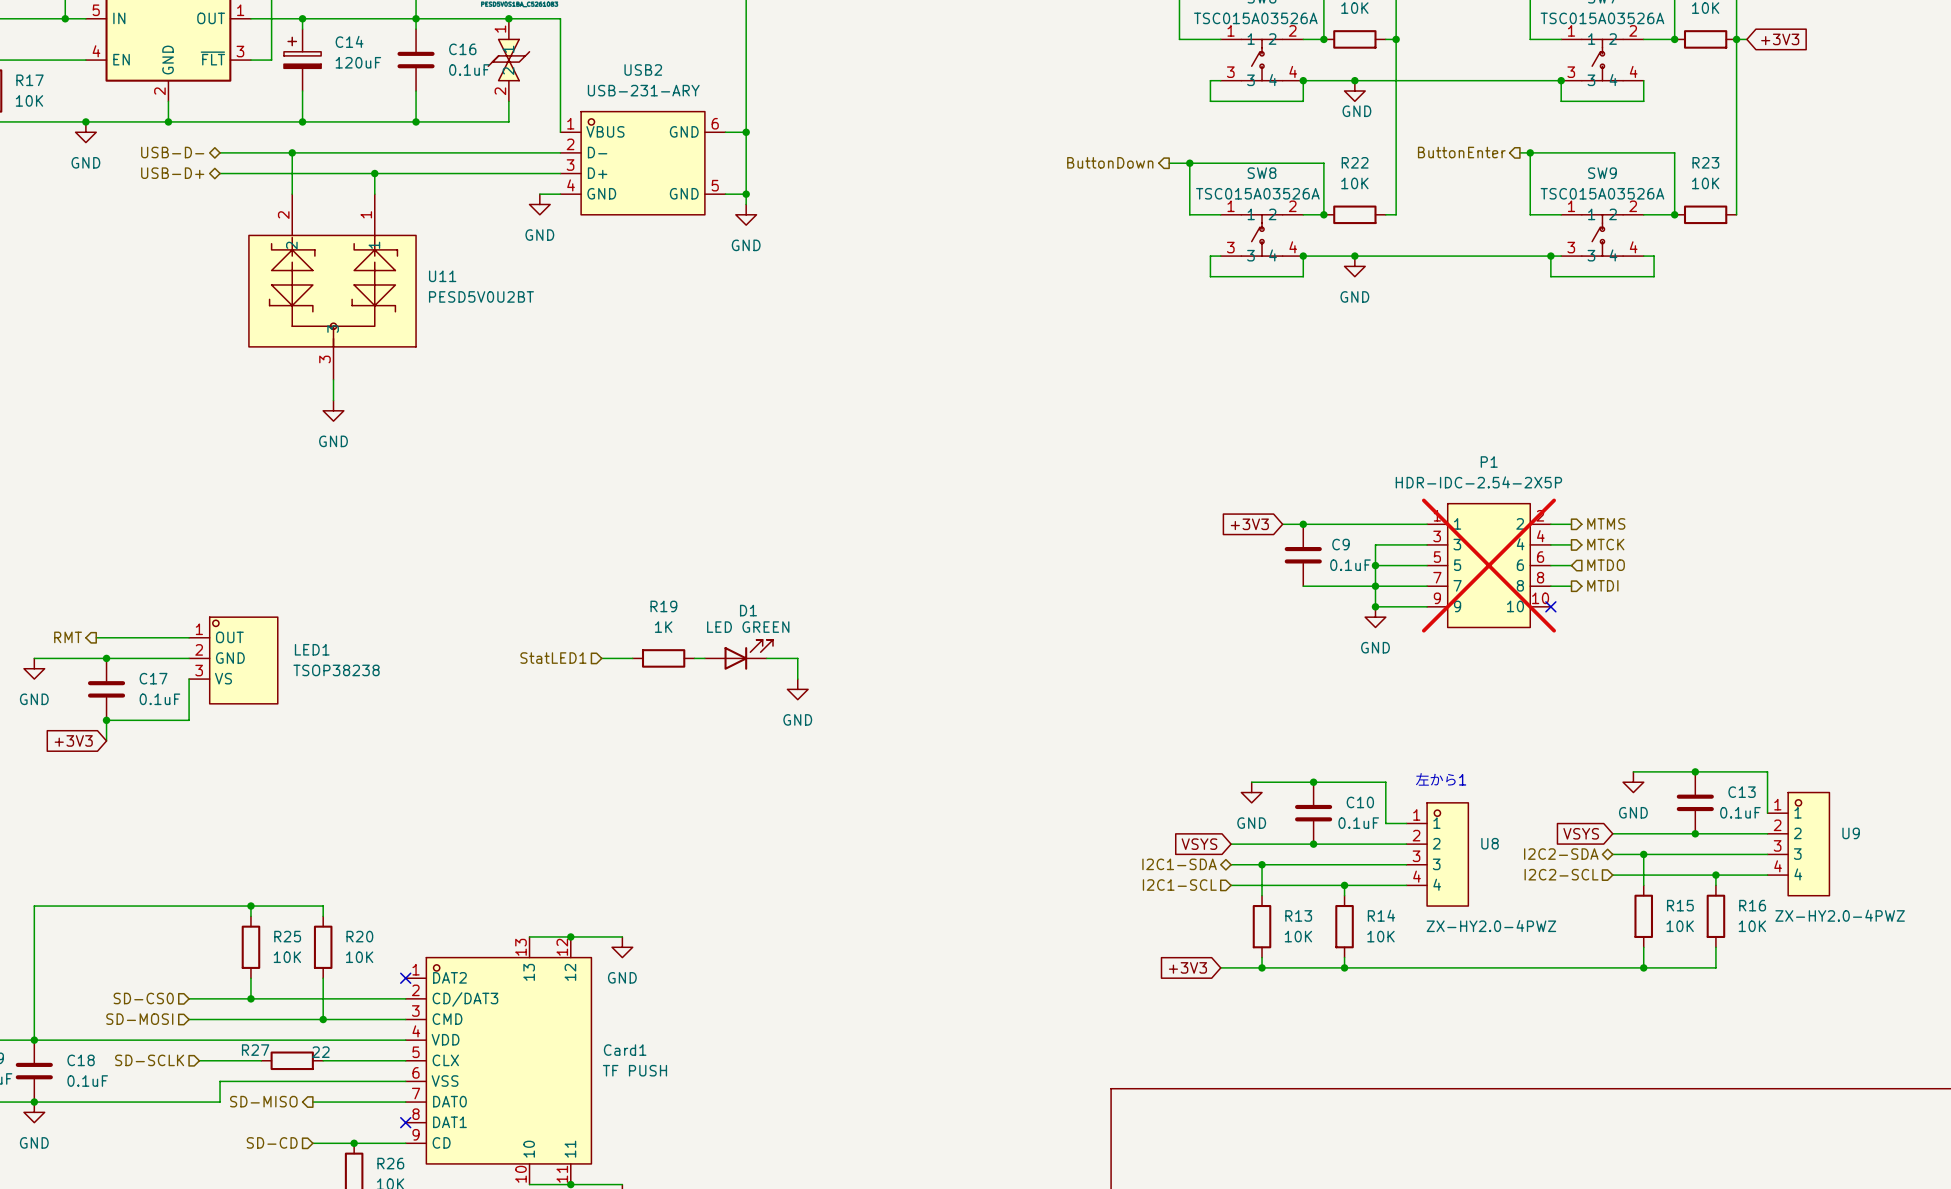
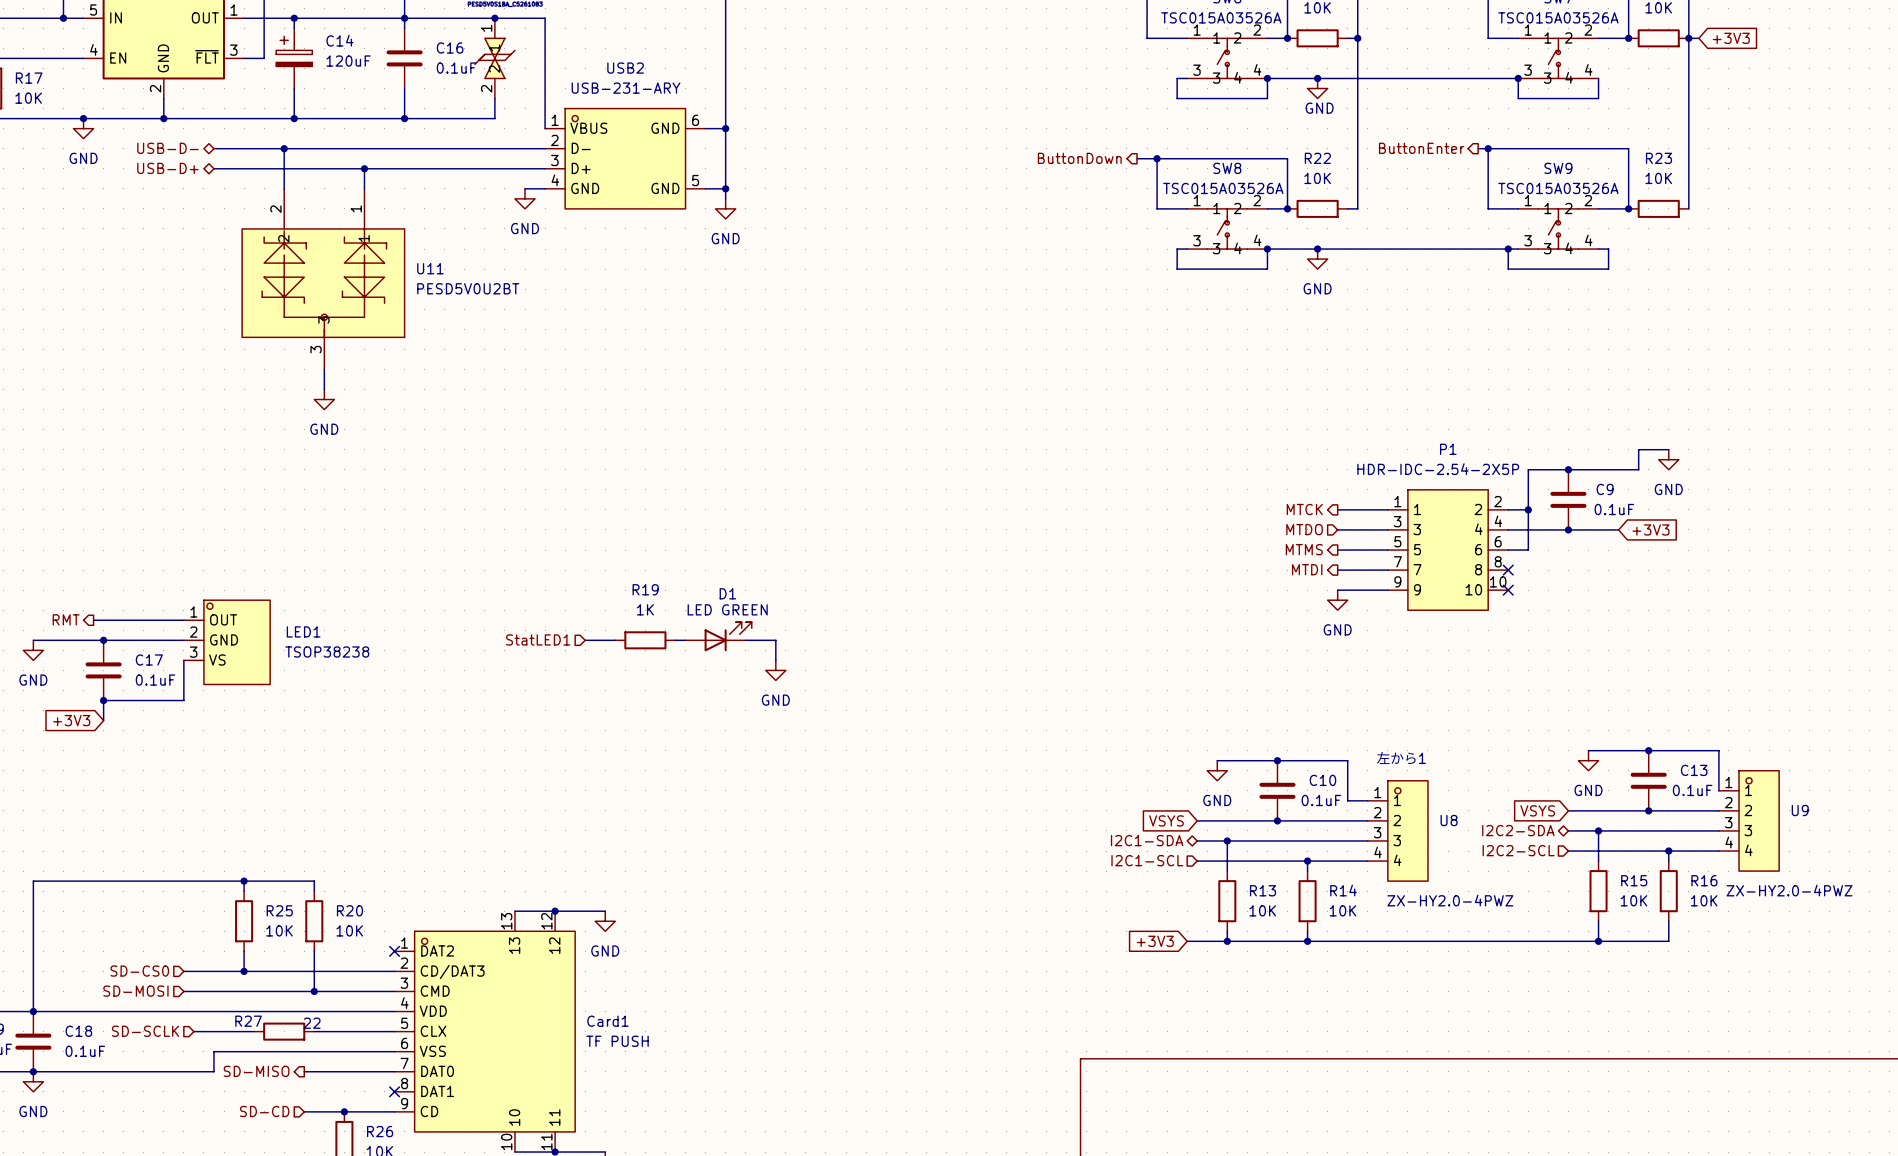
wire: none -> (1668, 449) (1638, 449) (1638, 469) (1528, 469) (1528, 550)
power symbol: none -> GND (1668, 459)
junction: none -> (1568, 469)
hierarchical label: none -> MTCK (1304, 509)
hierarchical label: MTMS (1606, 523) -> none
global label: +3V3 (1249, 524) -> none
wire: (1282, 524) (1375, 524) -> none
junction: (1303, 524) -> none
junction: none -> (1528, 509)
hierarchical label: none -> MTDO (1304, 529)
wire: (1375, 544) (1375, 606) -> none
wire: none -> (1528, 529) (1618, 529)
hierarchical label: MTCK (1605, 544) -> none
junction: none -> (1568, 529)
global label: none -> +3V3 (1650, 529)
C9 position: (1303, 555) -> (1568, 499)
hierarchical label: none -> MTMS (1304, 549)
junction: (1375, 565) -> none
P1 do-not-place cross: (1488, 565) -> none
hierarchical label: MTDO (1606, 565) -> none
hierarchical label: none -> MTDI (1307, 569)
hierarchical label: MTDI (1602, 585) -> none
wire: (1303, 586) (1375, 586) -> none
junction: (1375, 586) -> none
wire: (1550, 586) (1571, 586) -> none
no-connect mark: none -> (1508, 570)
junction: (1375, 606) -> none

